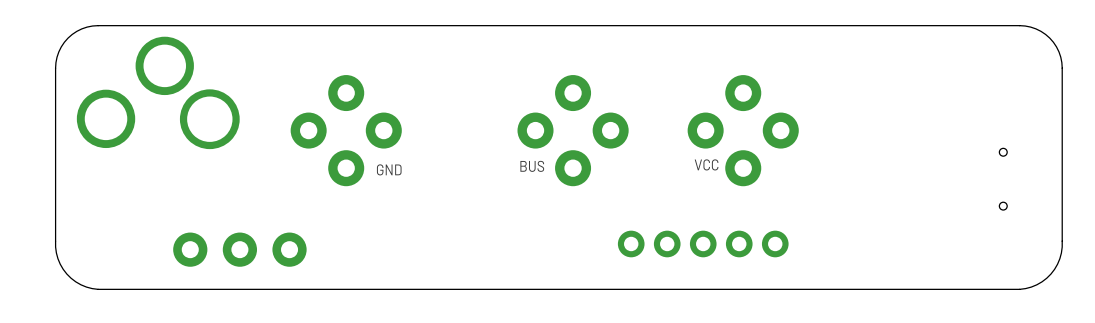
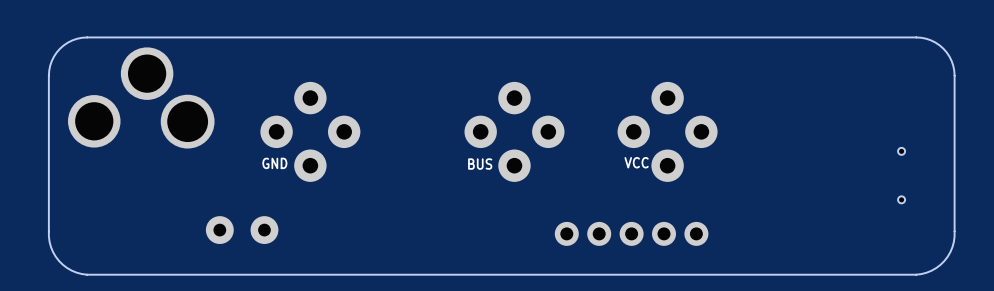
text position: GND (389, 169) -> GND (274, 163)
part: none -> (242, 230)
part: (239, 249) -> none

